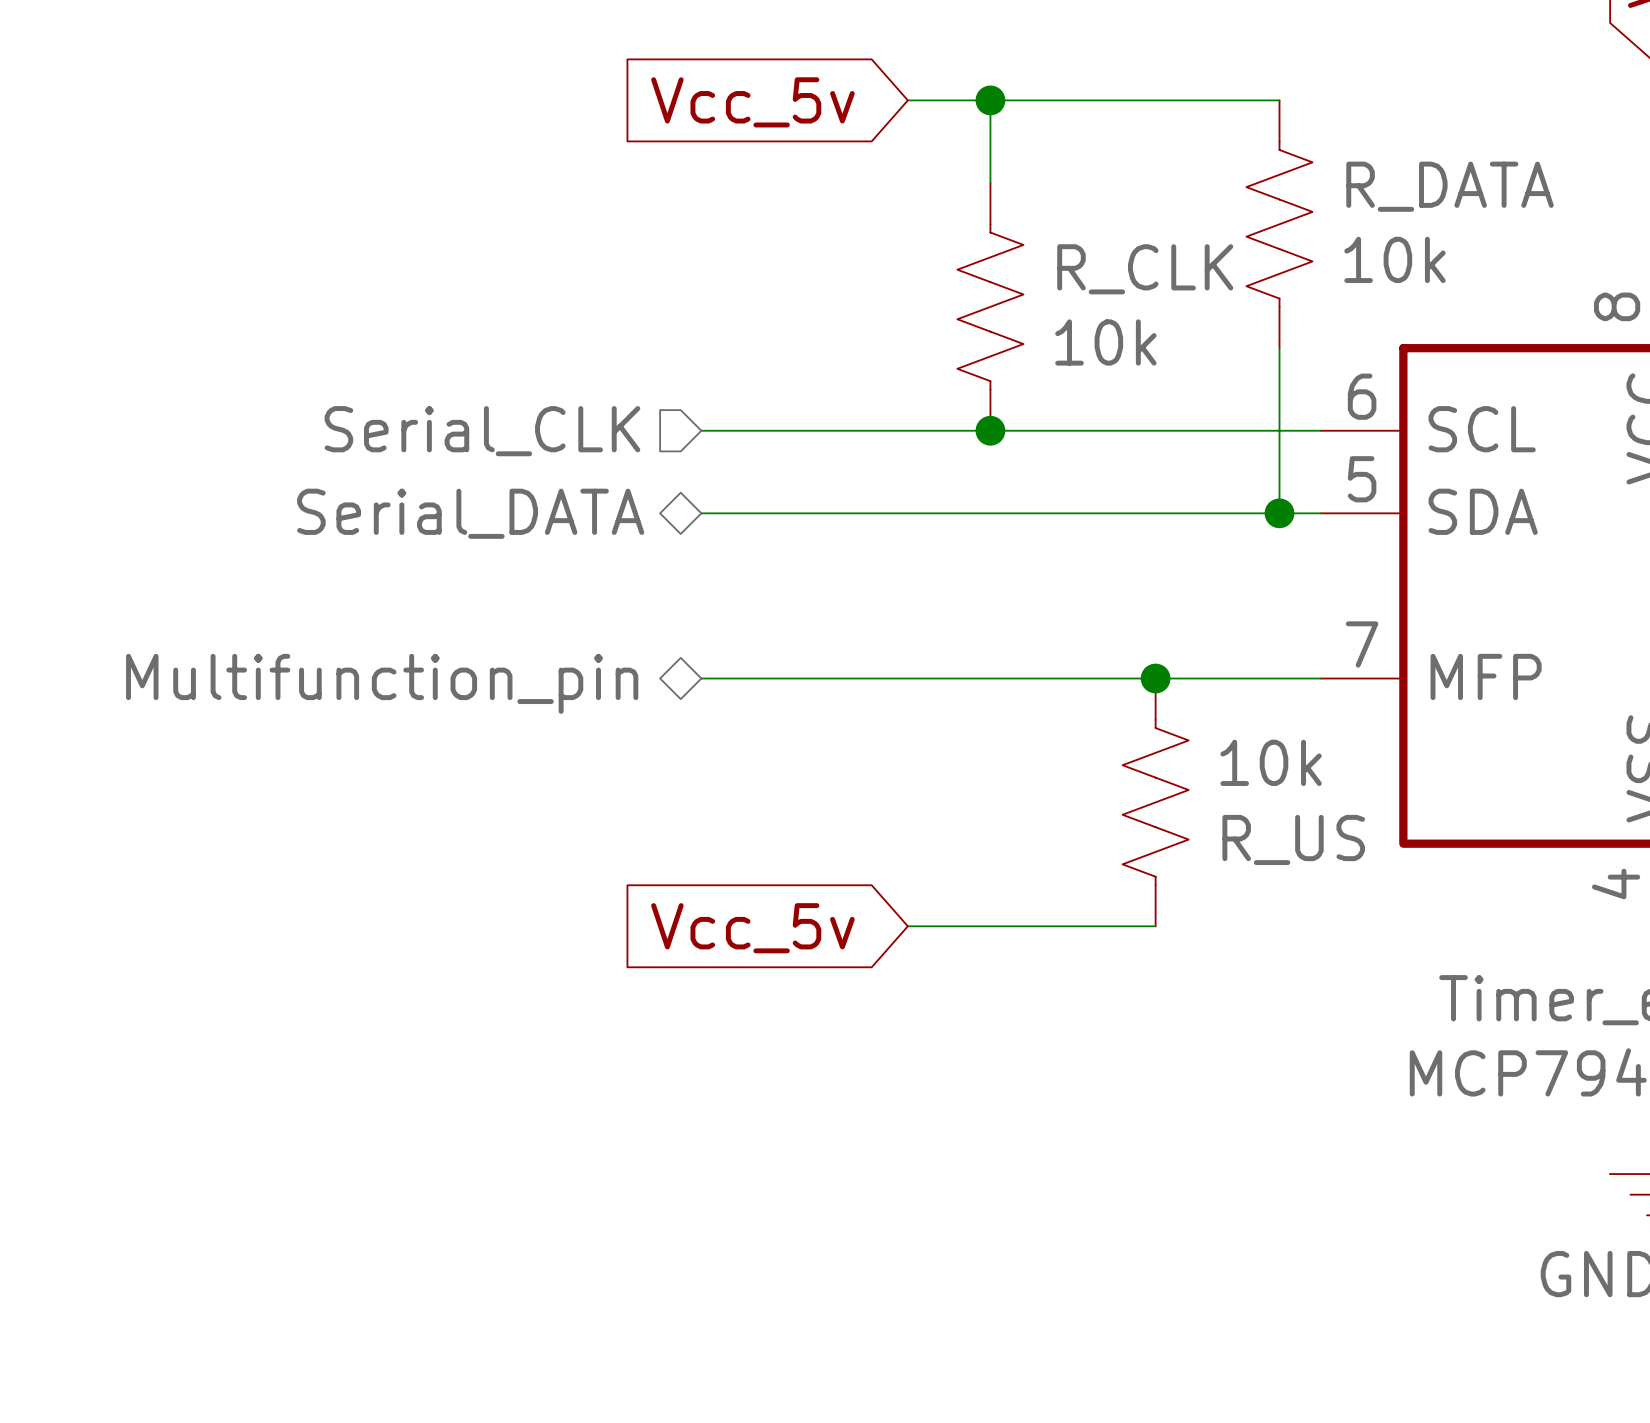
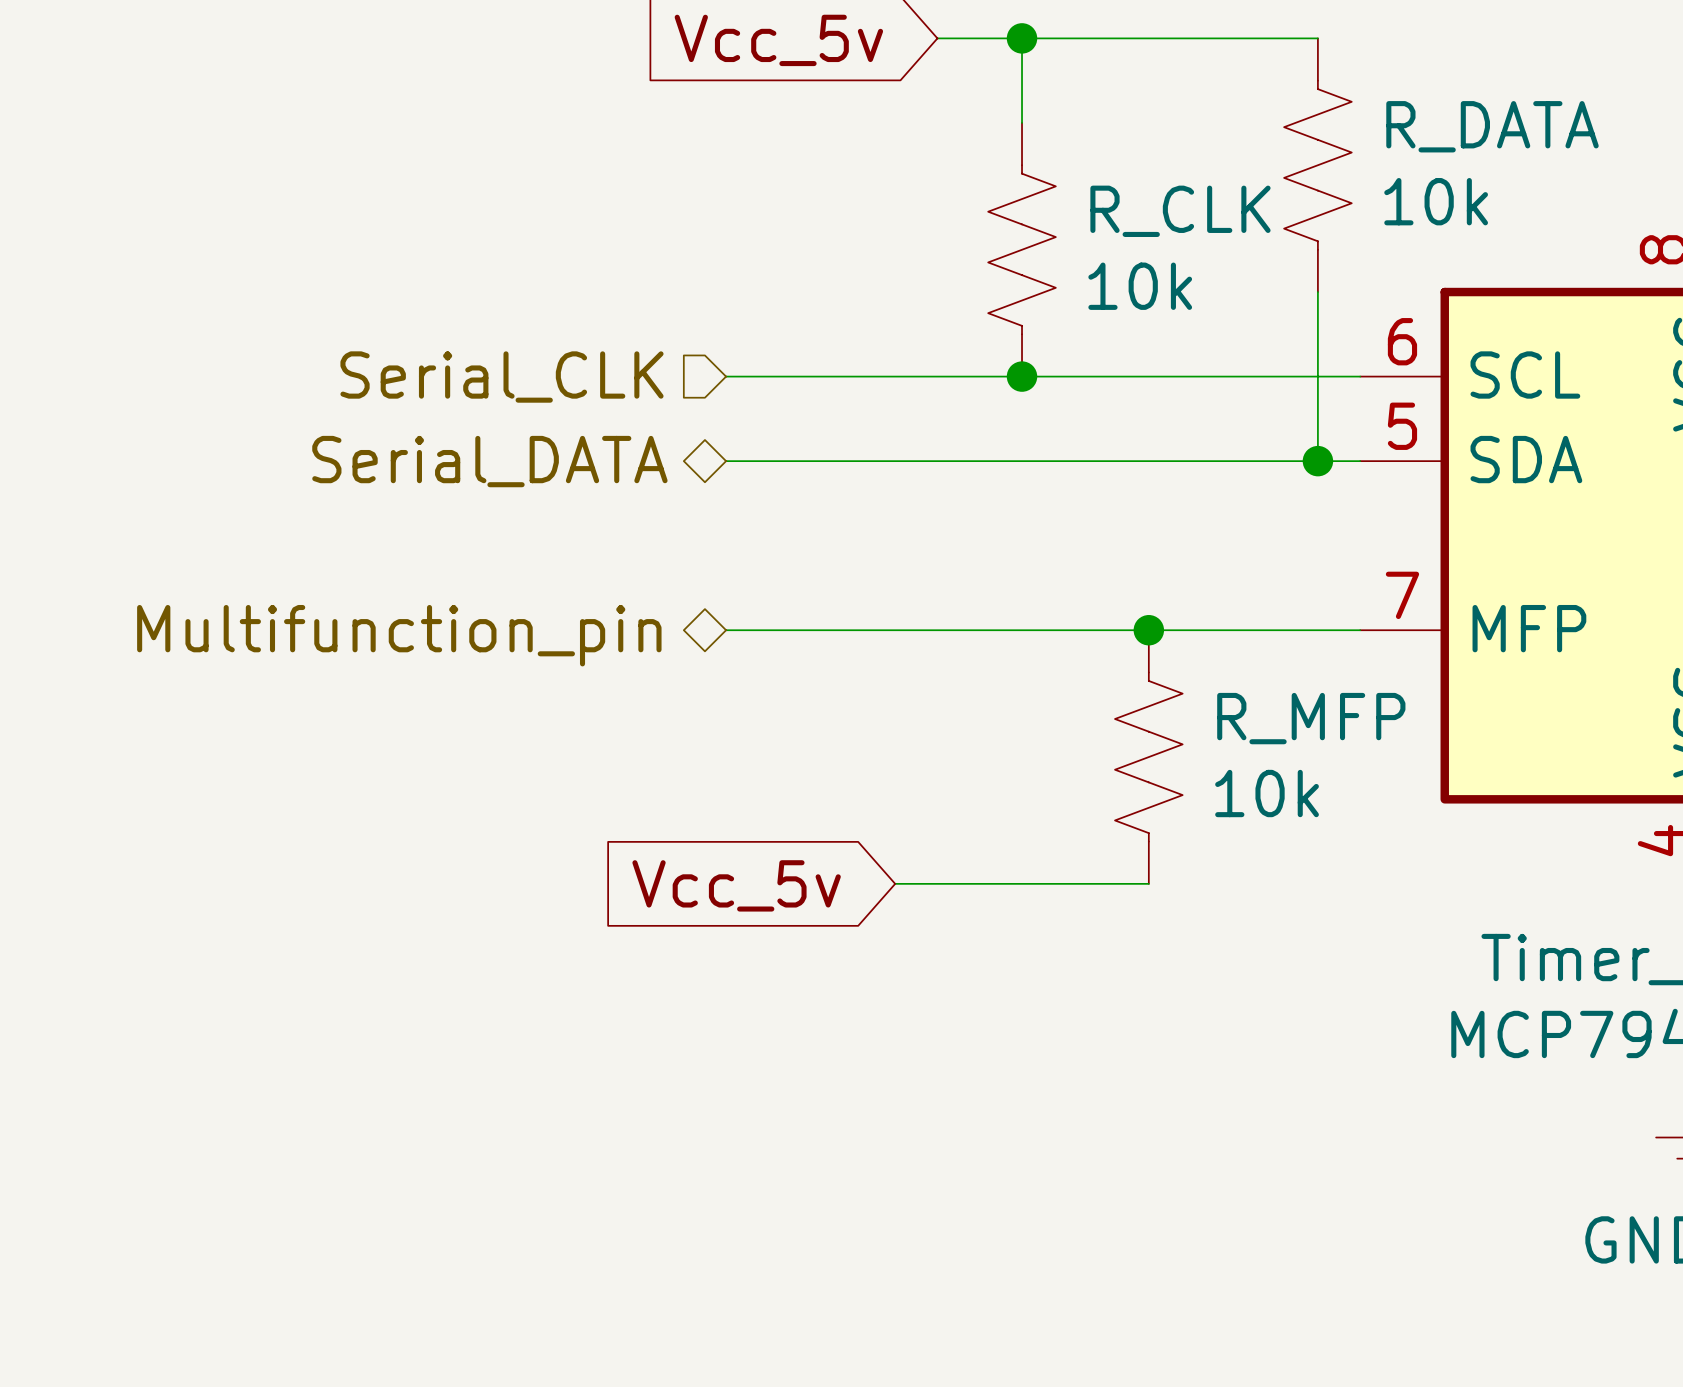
junction position: (1155, 678) -> (1148, 630)
R_MFP: none -> 10k (1148, 757)
10k: R_US (1155, 802) -> none
wire: (1114, 926) (1155, 926) -> (895, 883) (937, 883)
global label position: Vcc_5v (752, 928) -> Vcc_5v (736, 885)

